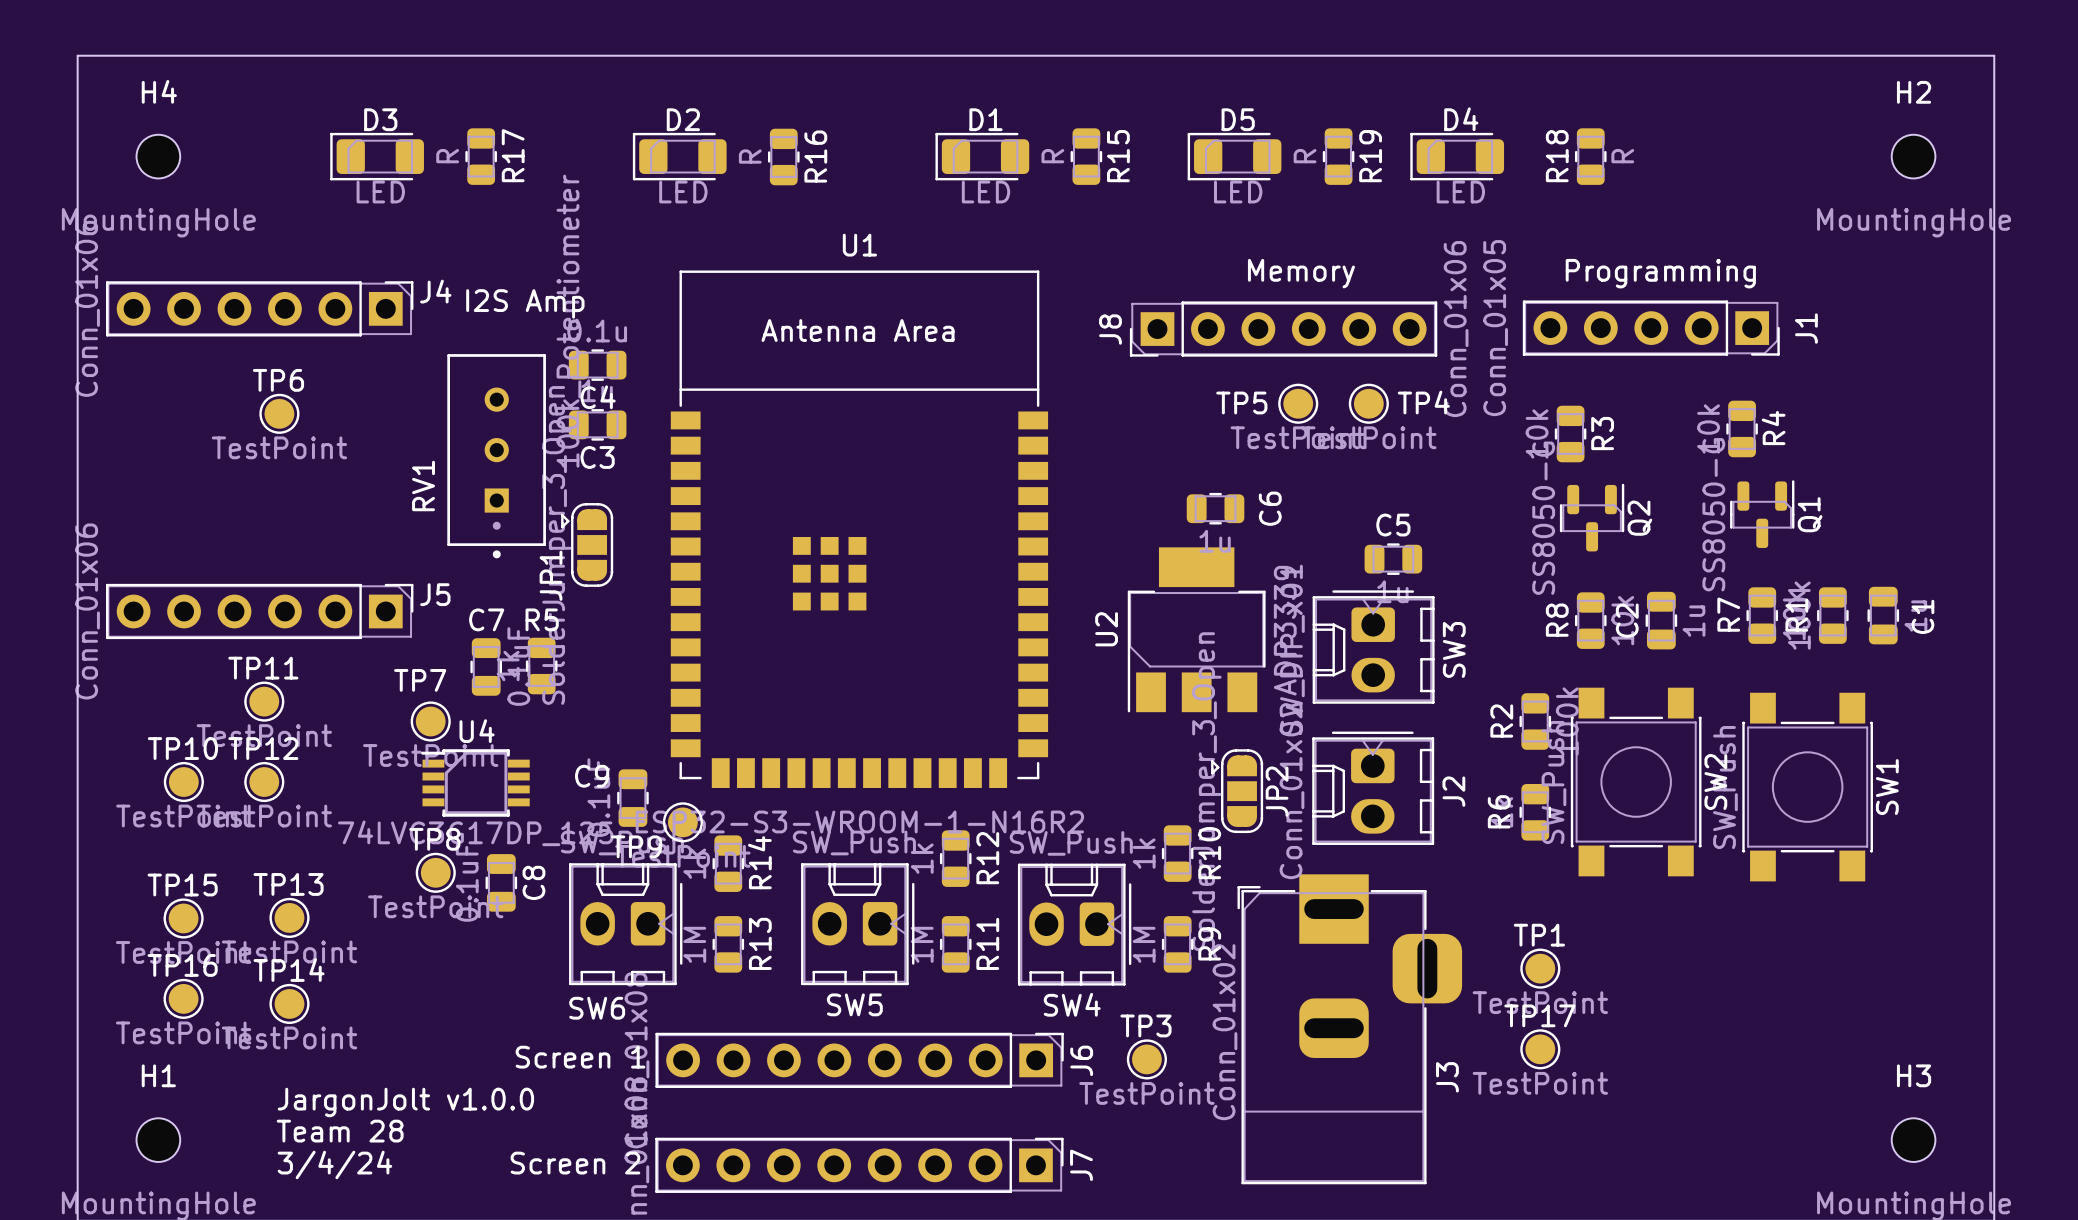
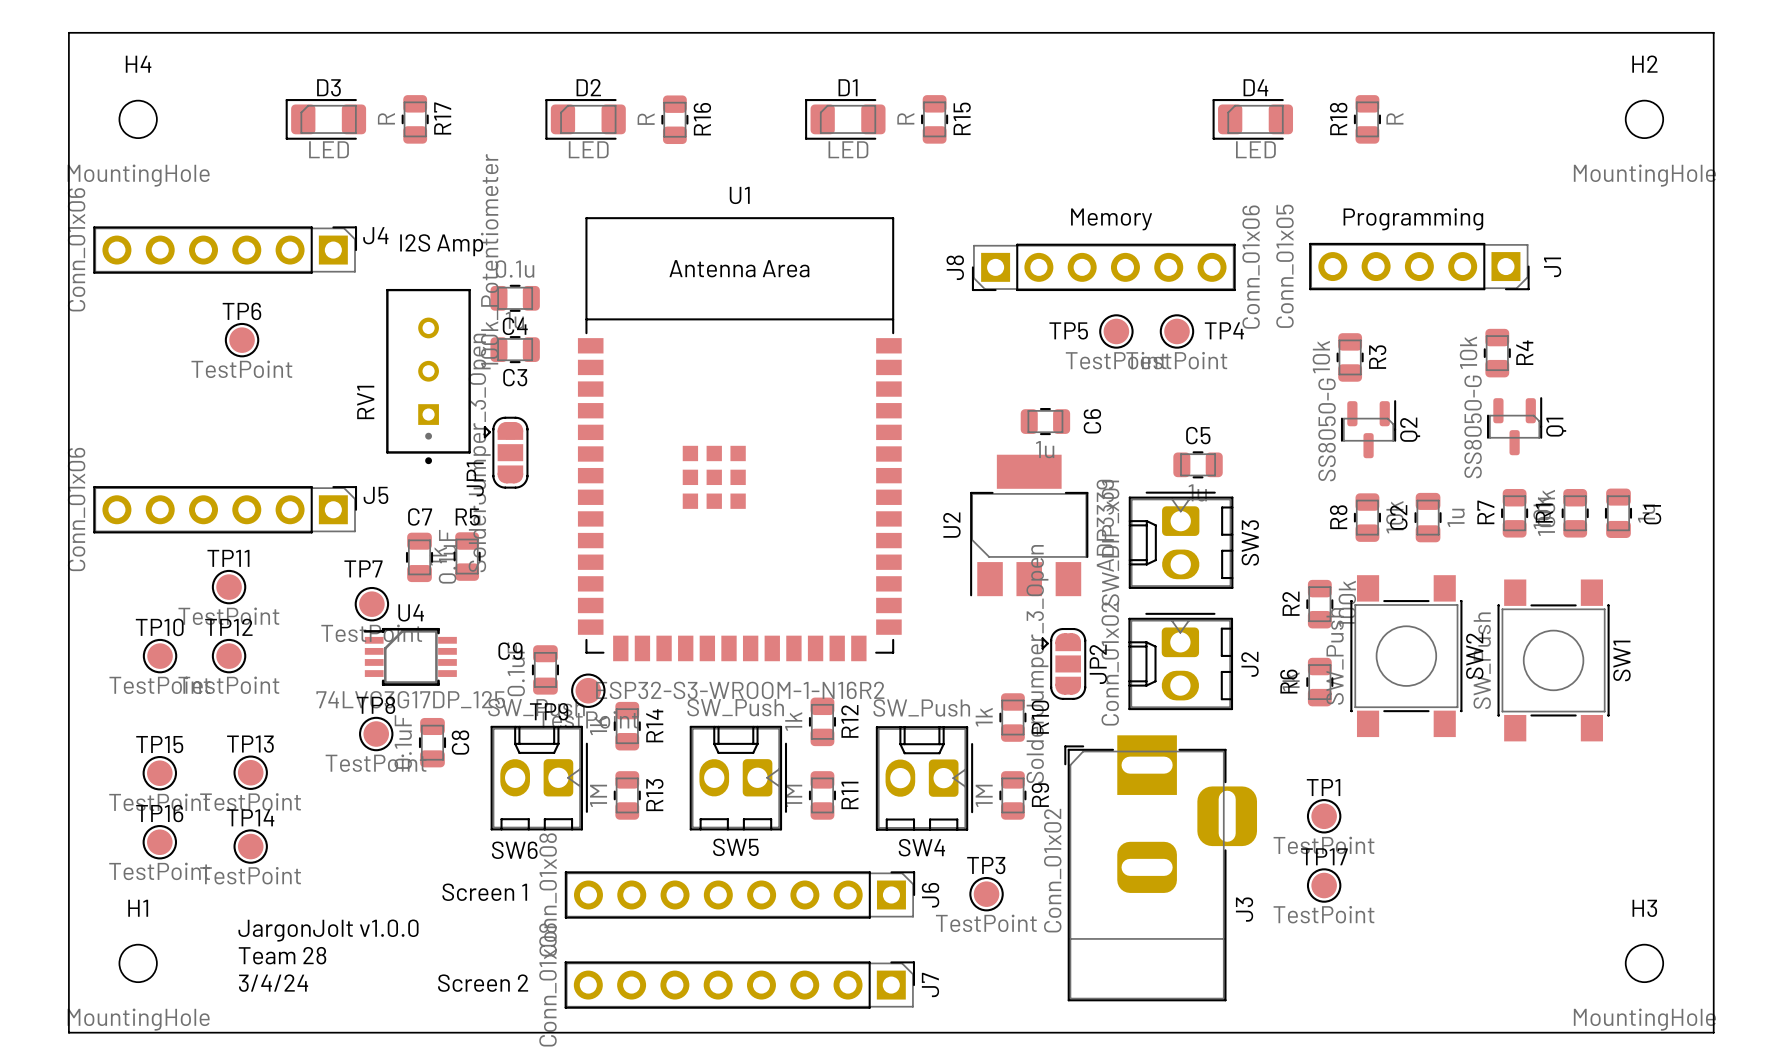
D5: LED (1234, 156) -> none
R19: R (1338, 156) -> none

